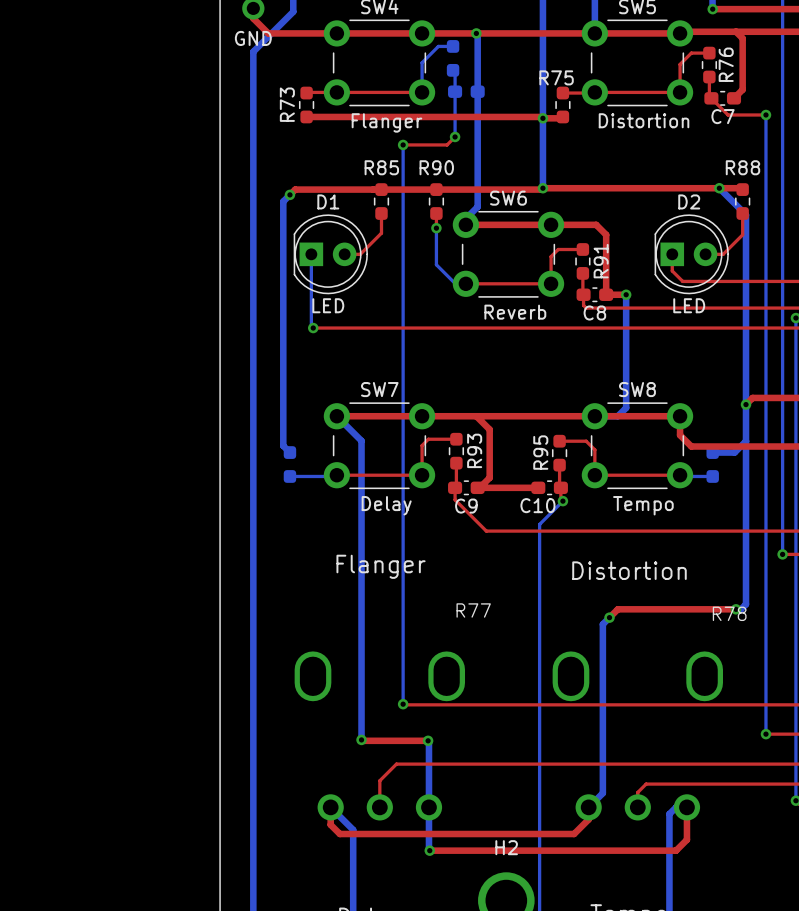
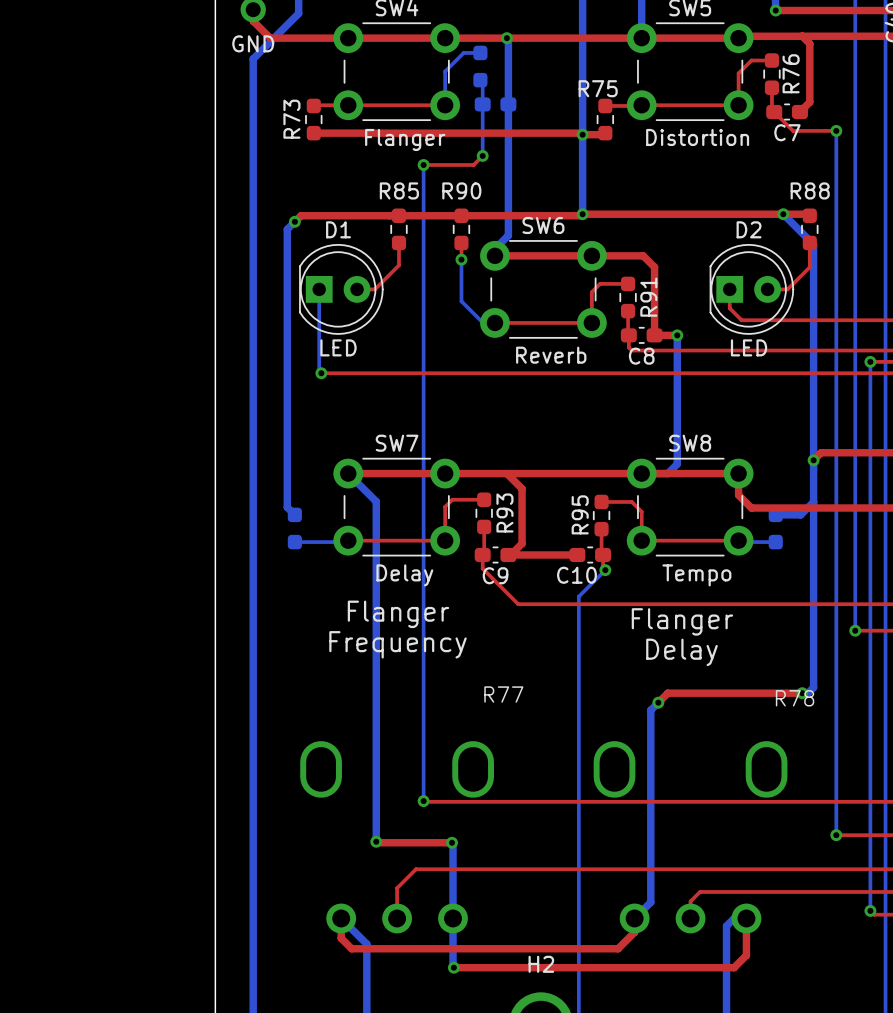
text: none -> Flanger (398, 614)
text: none -> Flanger (682, 621)
text: Flanger (381, 566) -> Frequency (398, 644)
text: Distortion (629, 570) -> Delay (681, 652)

